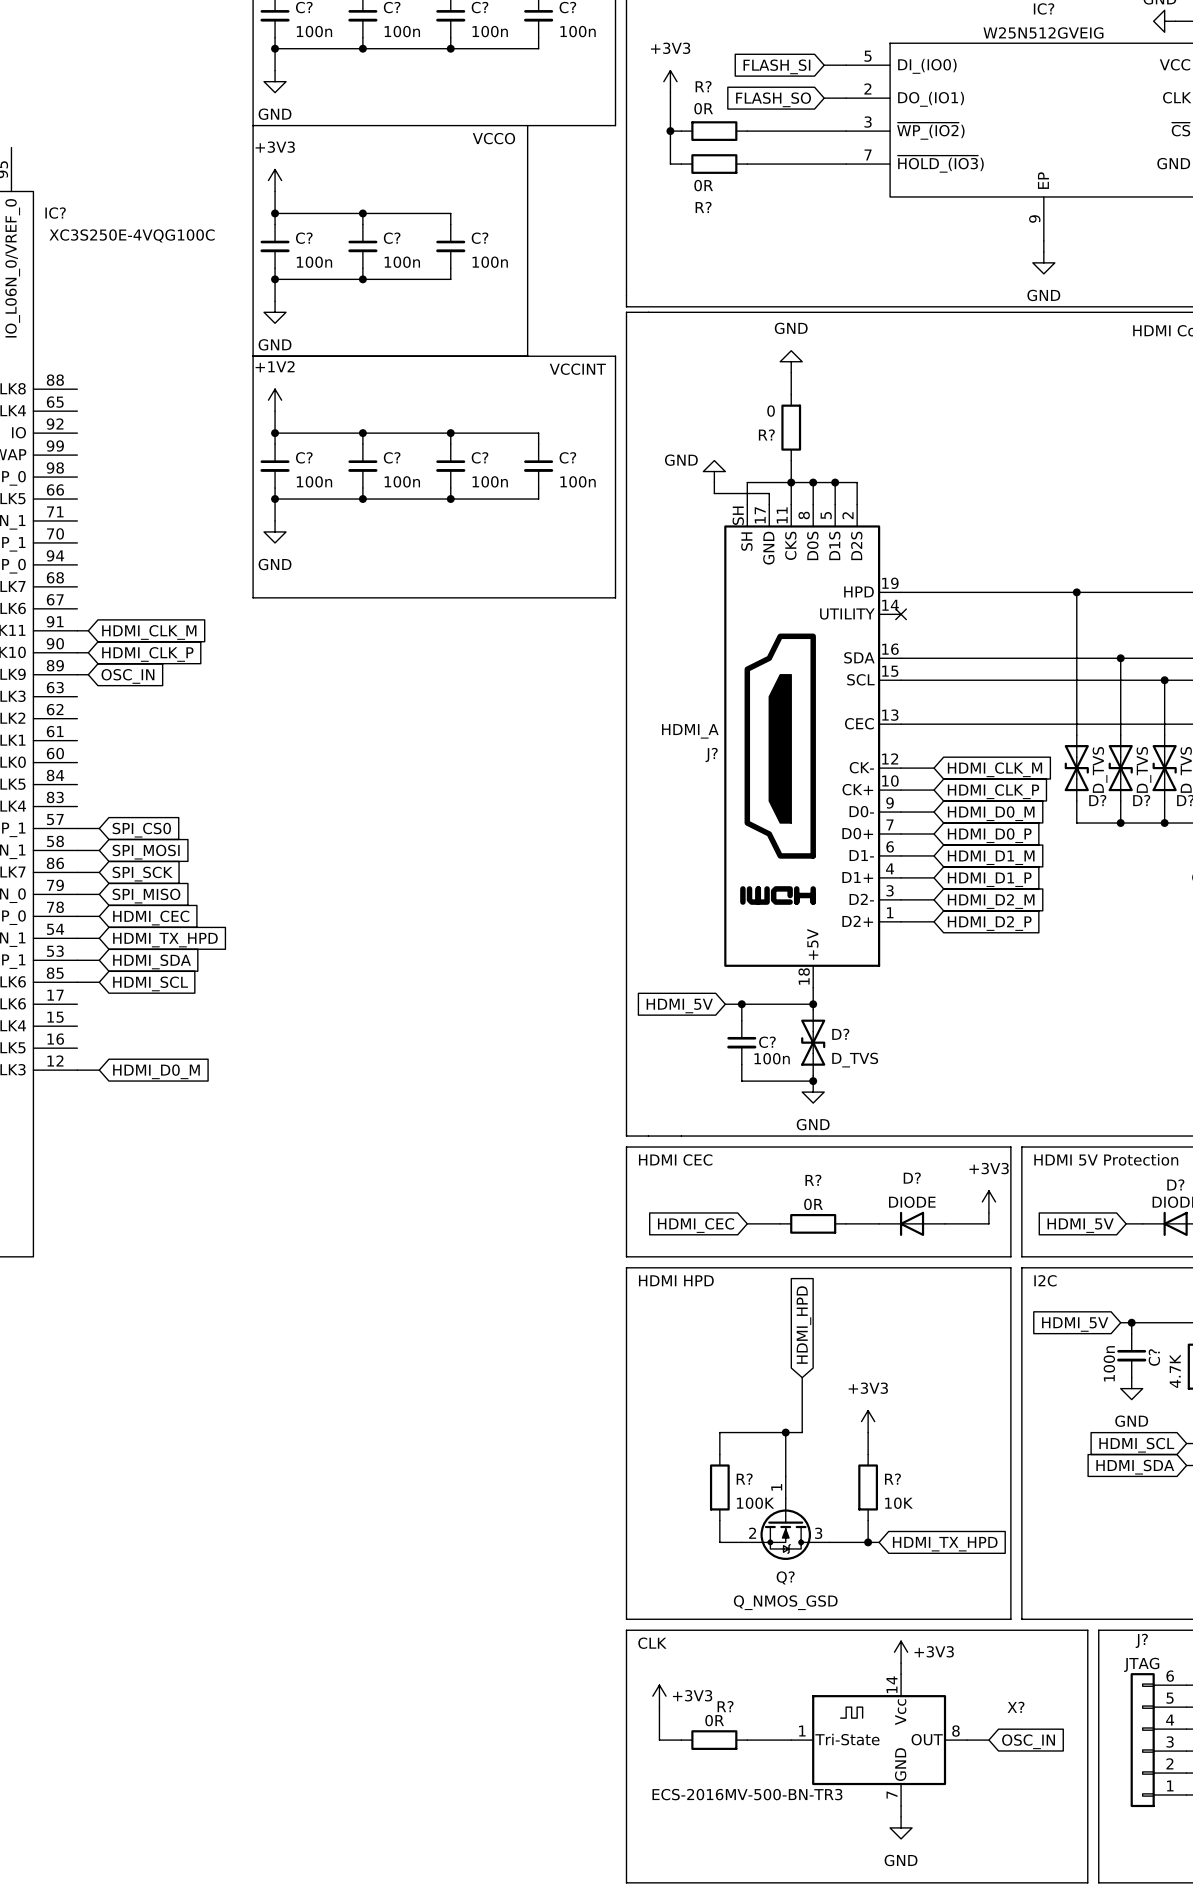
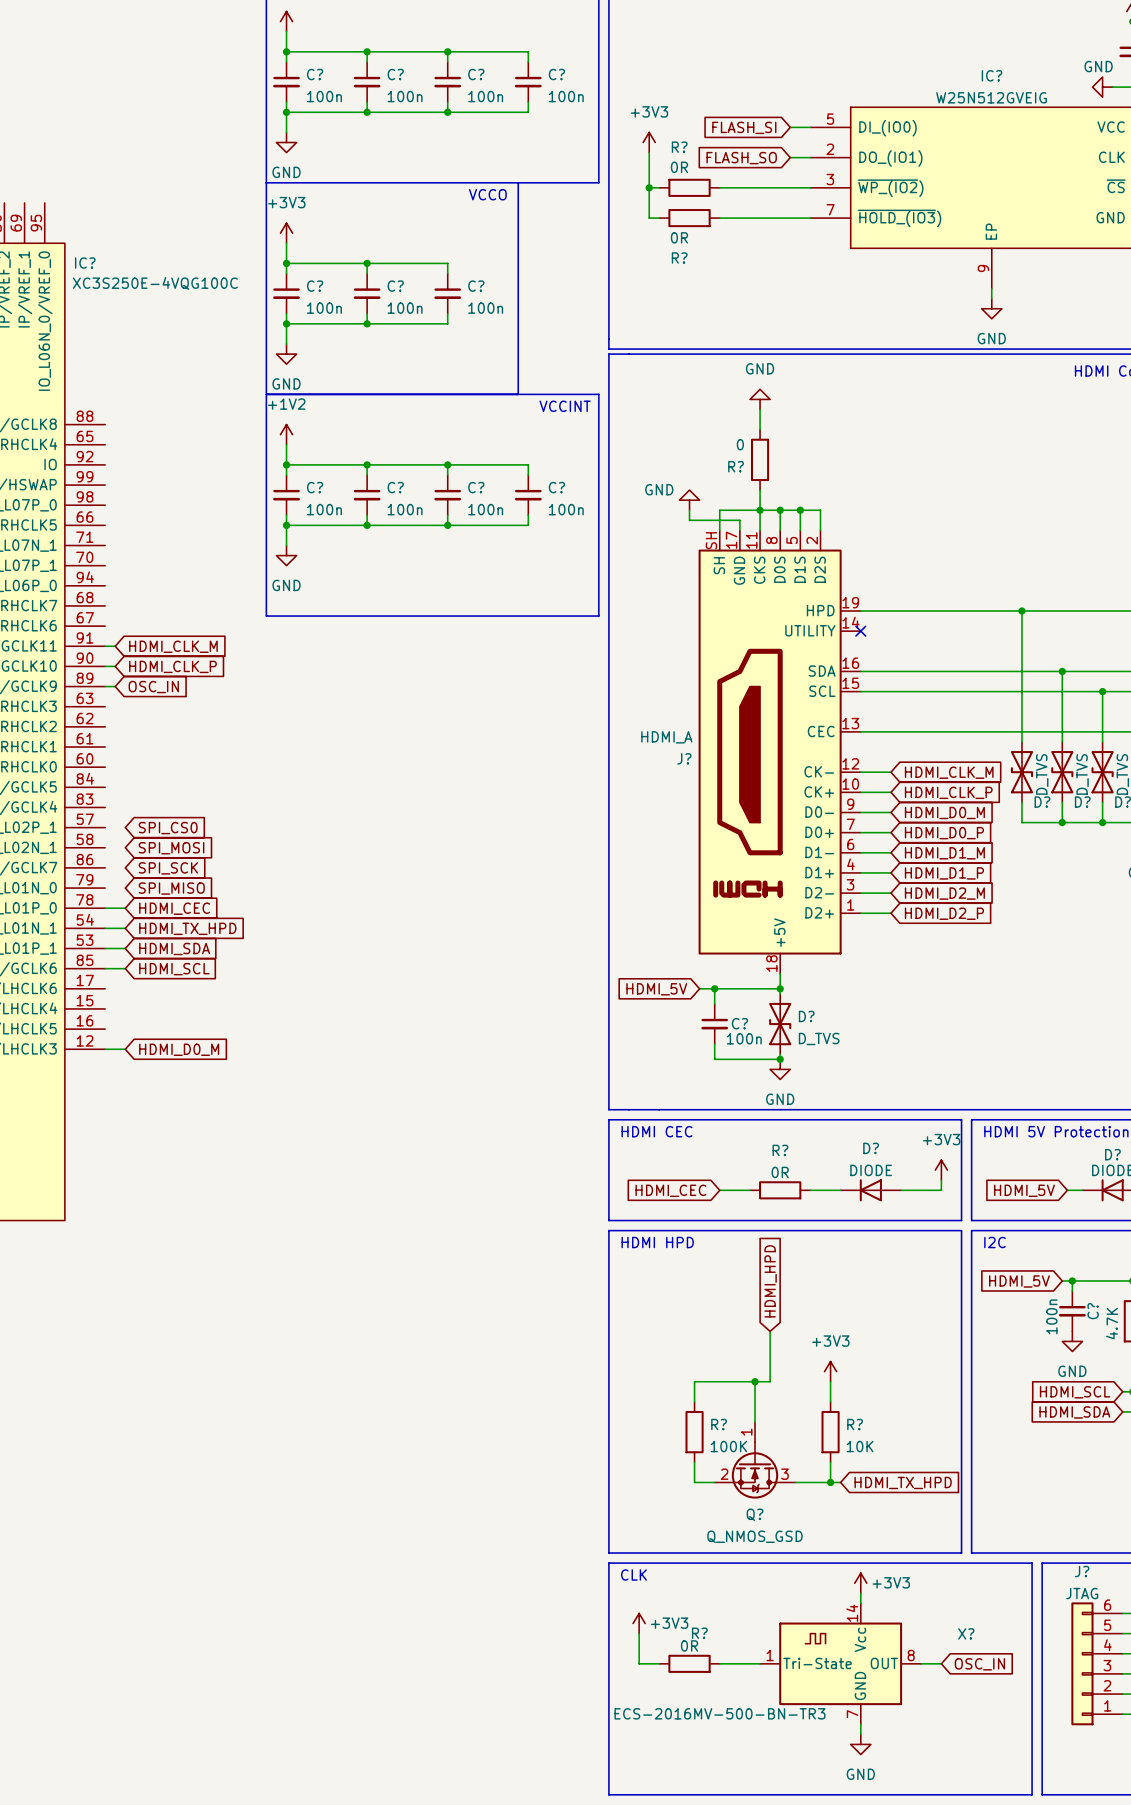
wire: (77, 828) (99, 828) -> none
wire: (77, 850) (99, 850) -> none
wire: (77, 872) (99, 872) -> none
wire: (77, 894) (99, 894) -> none

